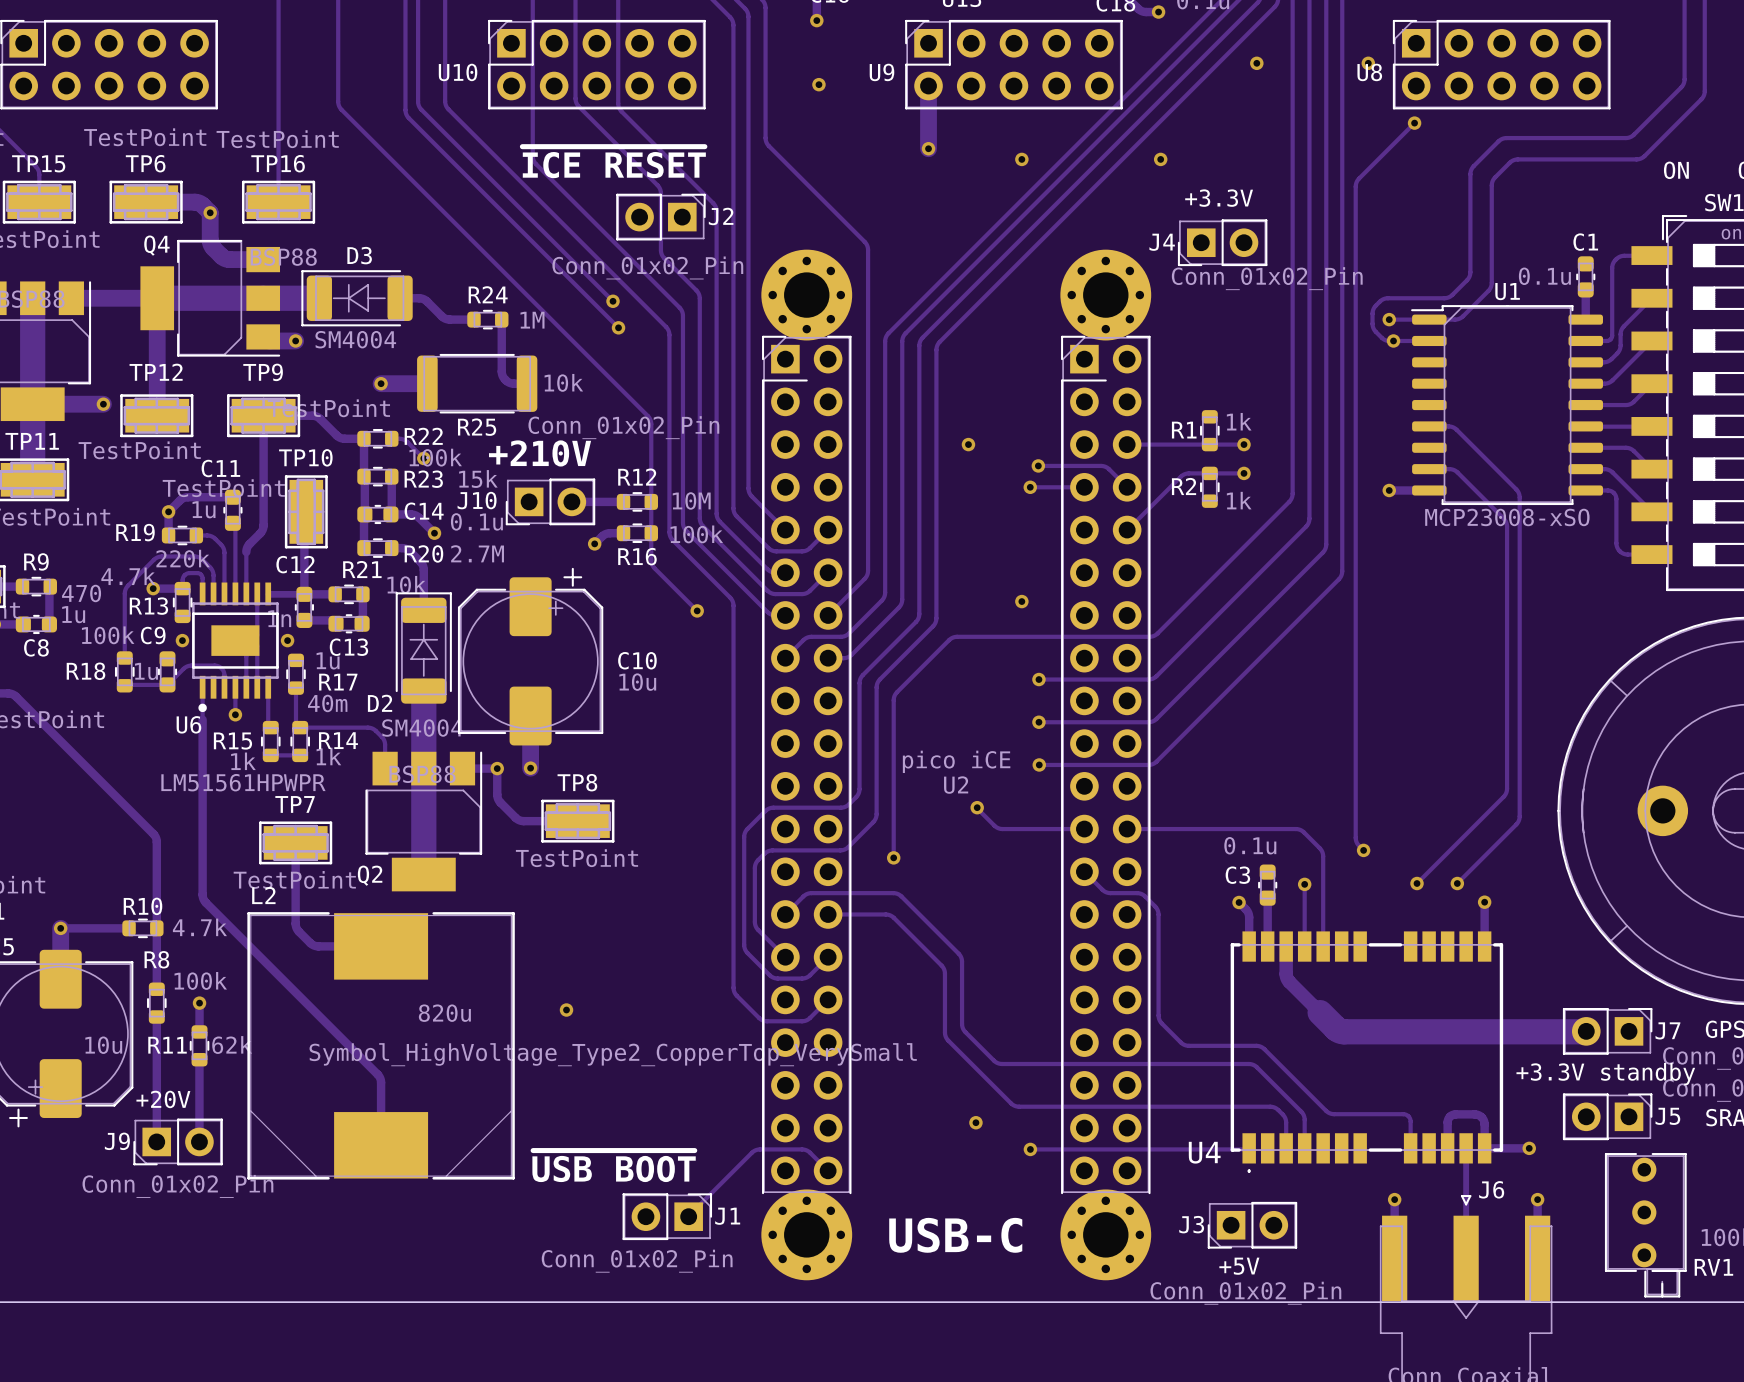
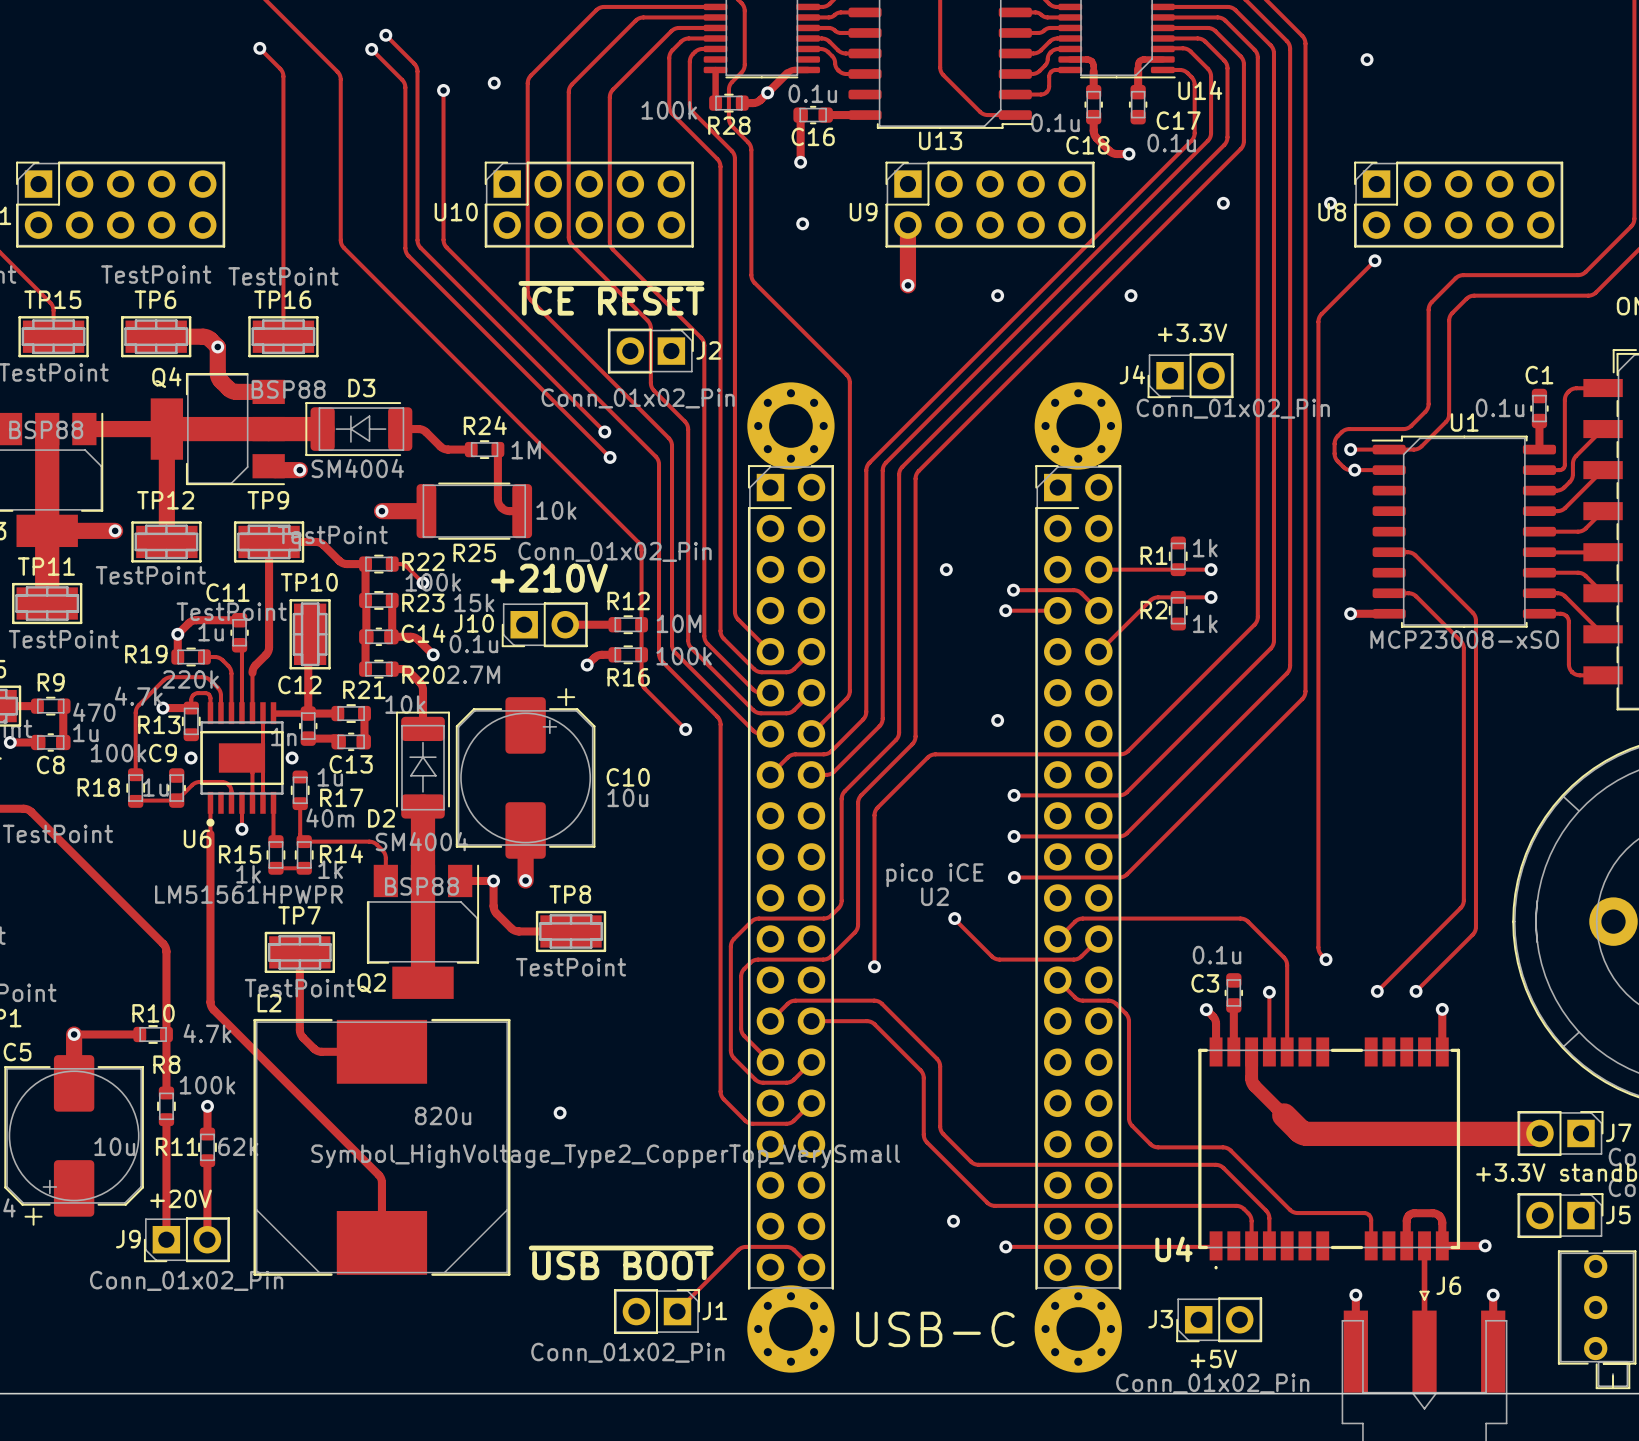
track: (994, 825) (1002, 829) (1084, 829) -> (971, 935) (992, 957) (999, 959) (1076, 959) (1098, 939)
track: (1127, 829) (1295, 829) (1303, 832) -> (1057, 939) (1075, 921) (1081, 918) (1240, 918) (1247, 921) (1268, 942)

